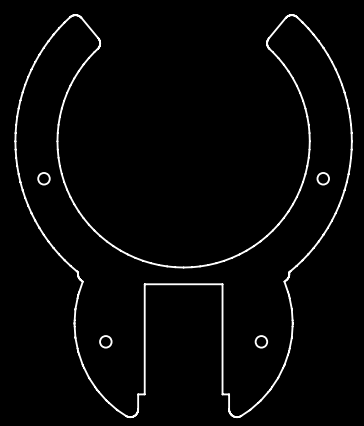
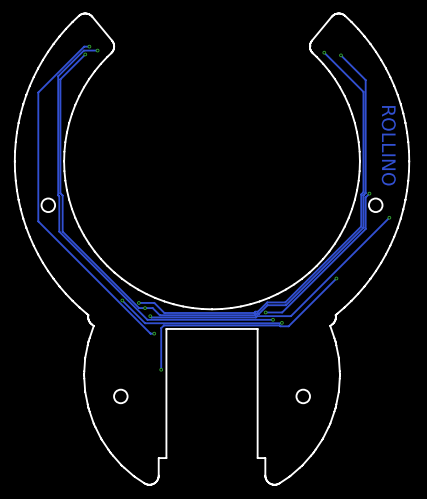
track: none -> (89, 46) (84, 46) (38, 92) (38, 221) (150, 333) (154, 333)
via: none -> (89, 46)
track: none -> (97, 50) (83, 50) (58, 76) (59, 231) (147, 319) (273, 319)
via: none -> (97, 50)
track: none -> (324, 52) (363, 91) (363, 192) (361, 194) (361, 226) (285, 302) (267, 302) (254, 312) (164, 312) (154, 302) (138, 302)
via: none -> (324, 52)
track: none -> (85, 54) (60, 79) (60, 193) (62, 195) (62, 231) (139, 308) (152, 308) (159, 315) (255, 315) (267, 305) (285, 305) (363, 227) (363, 195) (365, 193) (365, 80) (340, 55)
via: none -> (85, 54)
via: none -> (340, 55)
text: none -> ROLLINO (388, 145)
track: none -> (369, 193) (365, 197) (365, 228) (282, 312) (265, 312)
via: none -> (369, 193)
track: none -> (389, 217) (290, 316) (150, 316)
via: none -> (389, 217)
track: none -> (336, 278) (288, 326) (163, 325) (161, 328) (161, 369)
via: none -> (336, 278)
track: none -> (122, 300) (145, 323) (281, 322)
via: none -> (122, 300)
via: none -> (138, 302)
via: none -> (145, 308)
via: none -> (265, 312)
via: none -> (150, 316)
via: none -> (273, 319)
via: none -> (281, 322)
via: none -> (154, 333)
via: none -> (161, 369)

